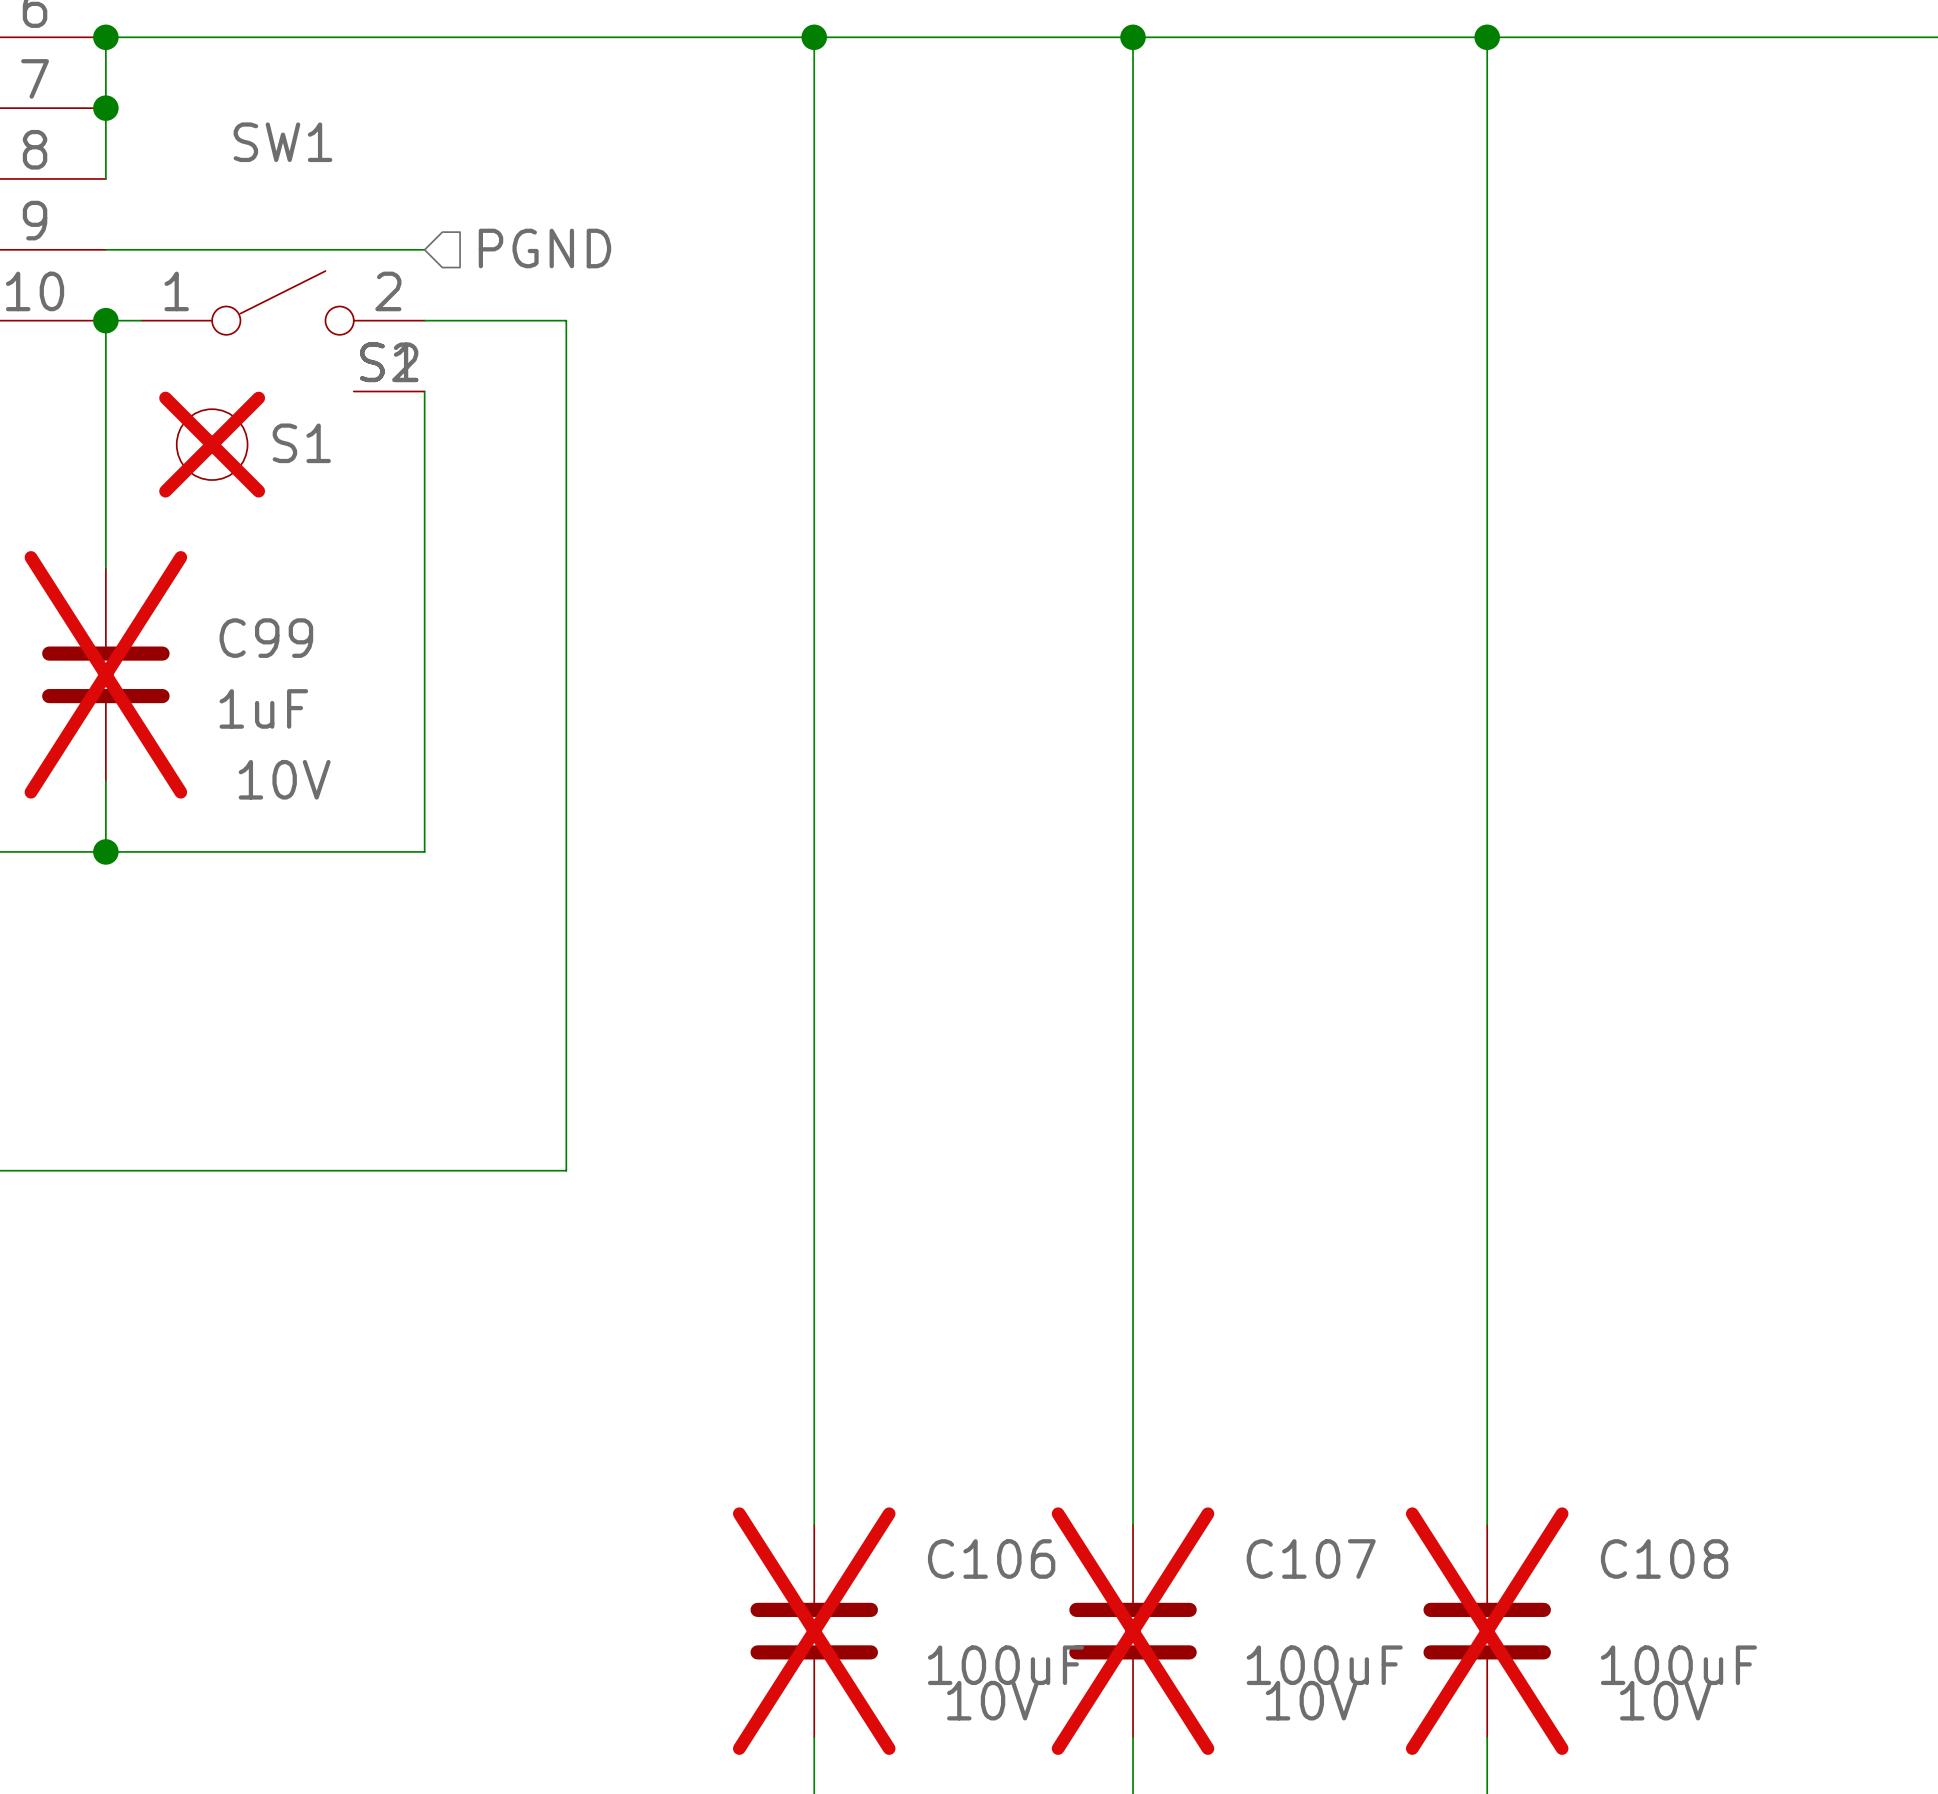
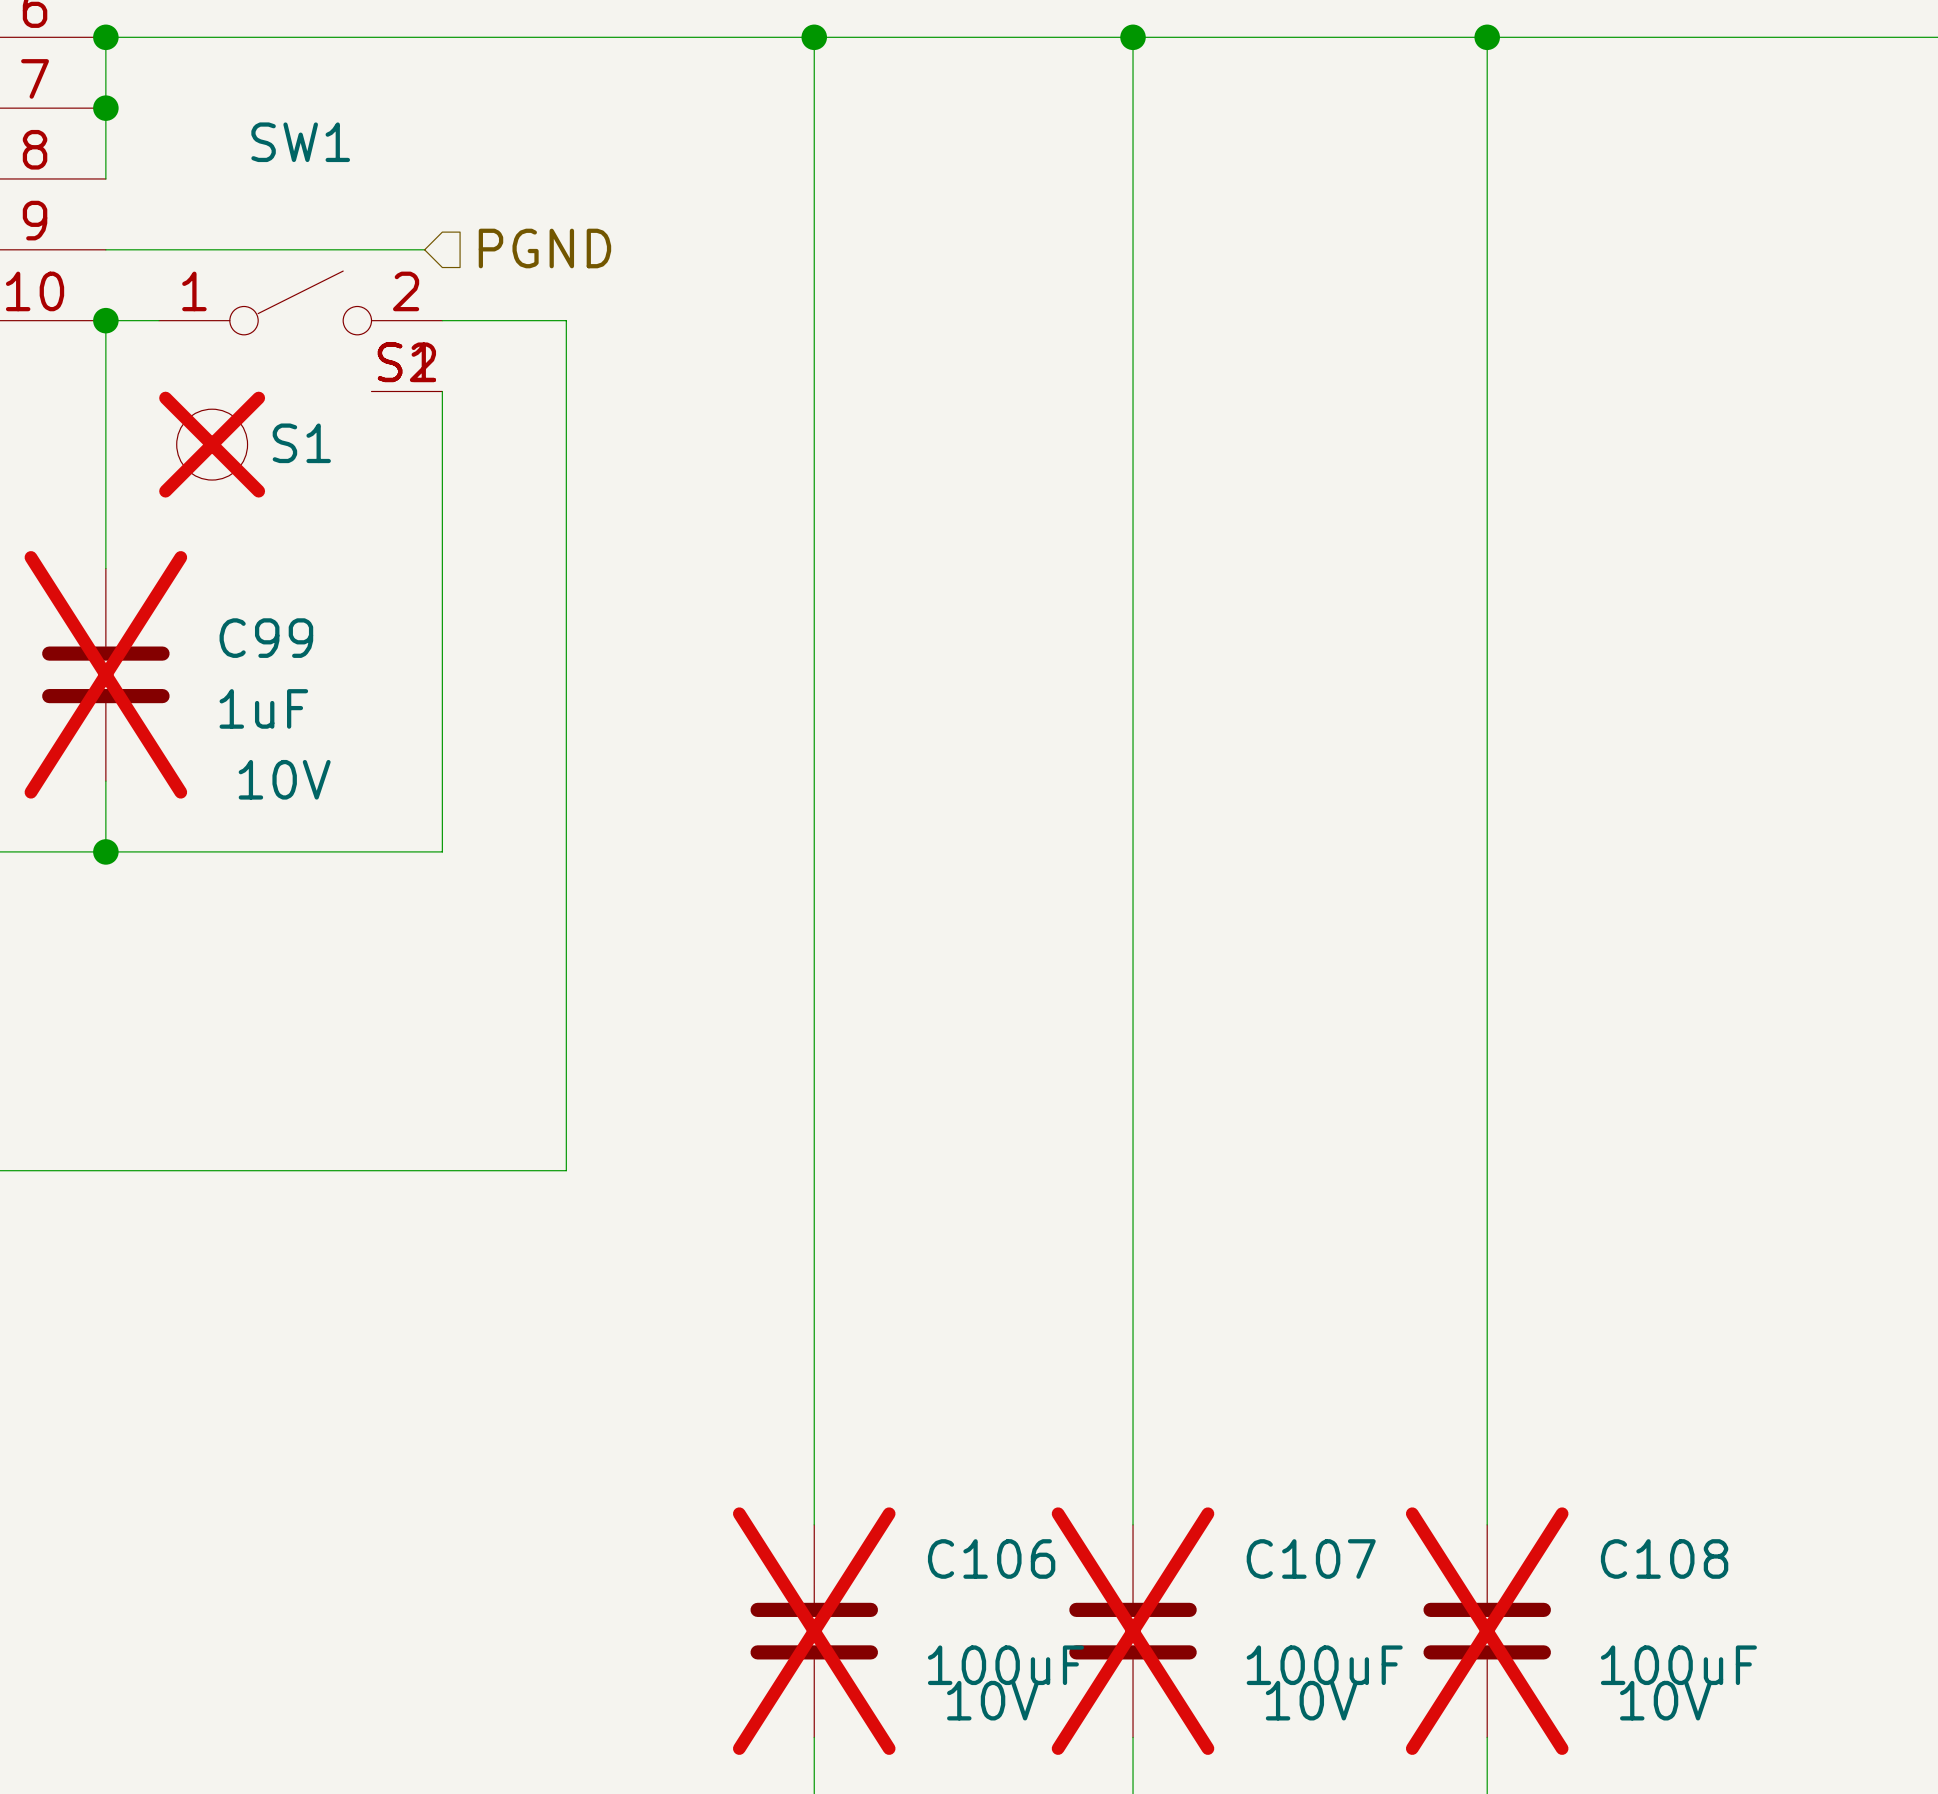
SW1 position: (282, 331) -> (300, 331)
wire: (424, 391) (424, 851) -> (442, 391) (442, 851) (424, 851)

